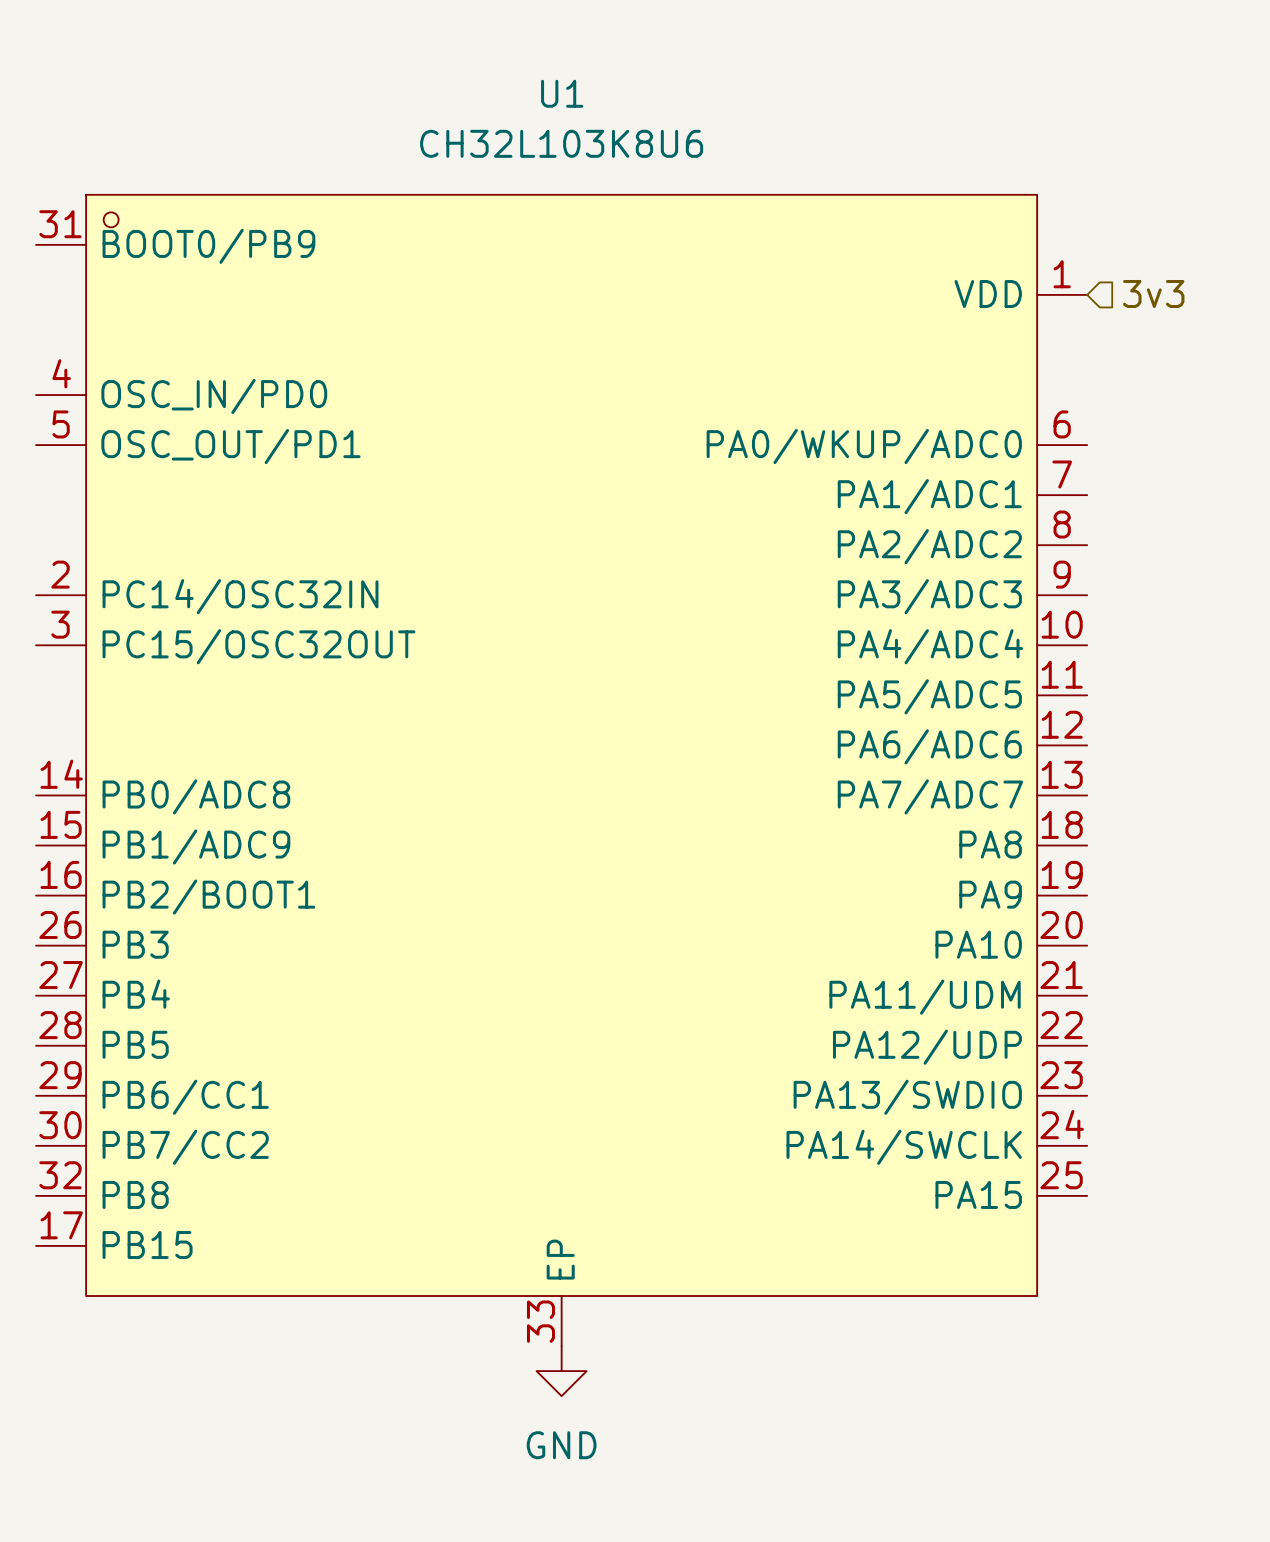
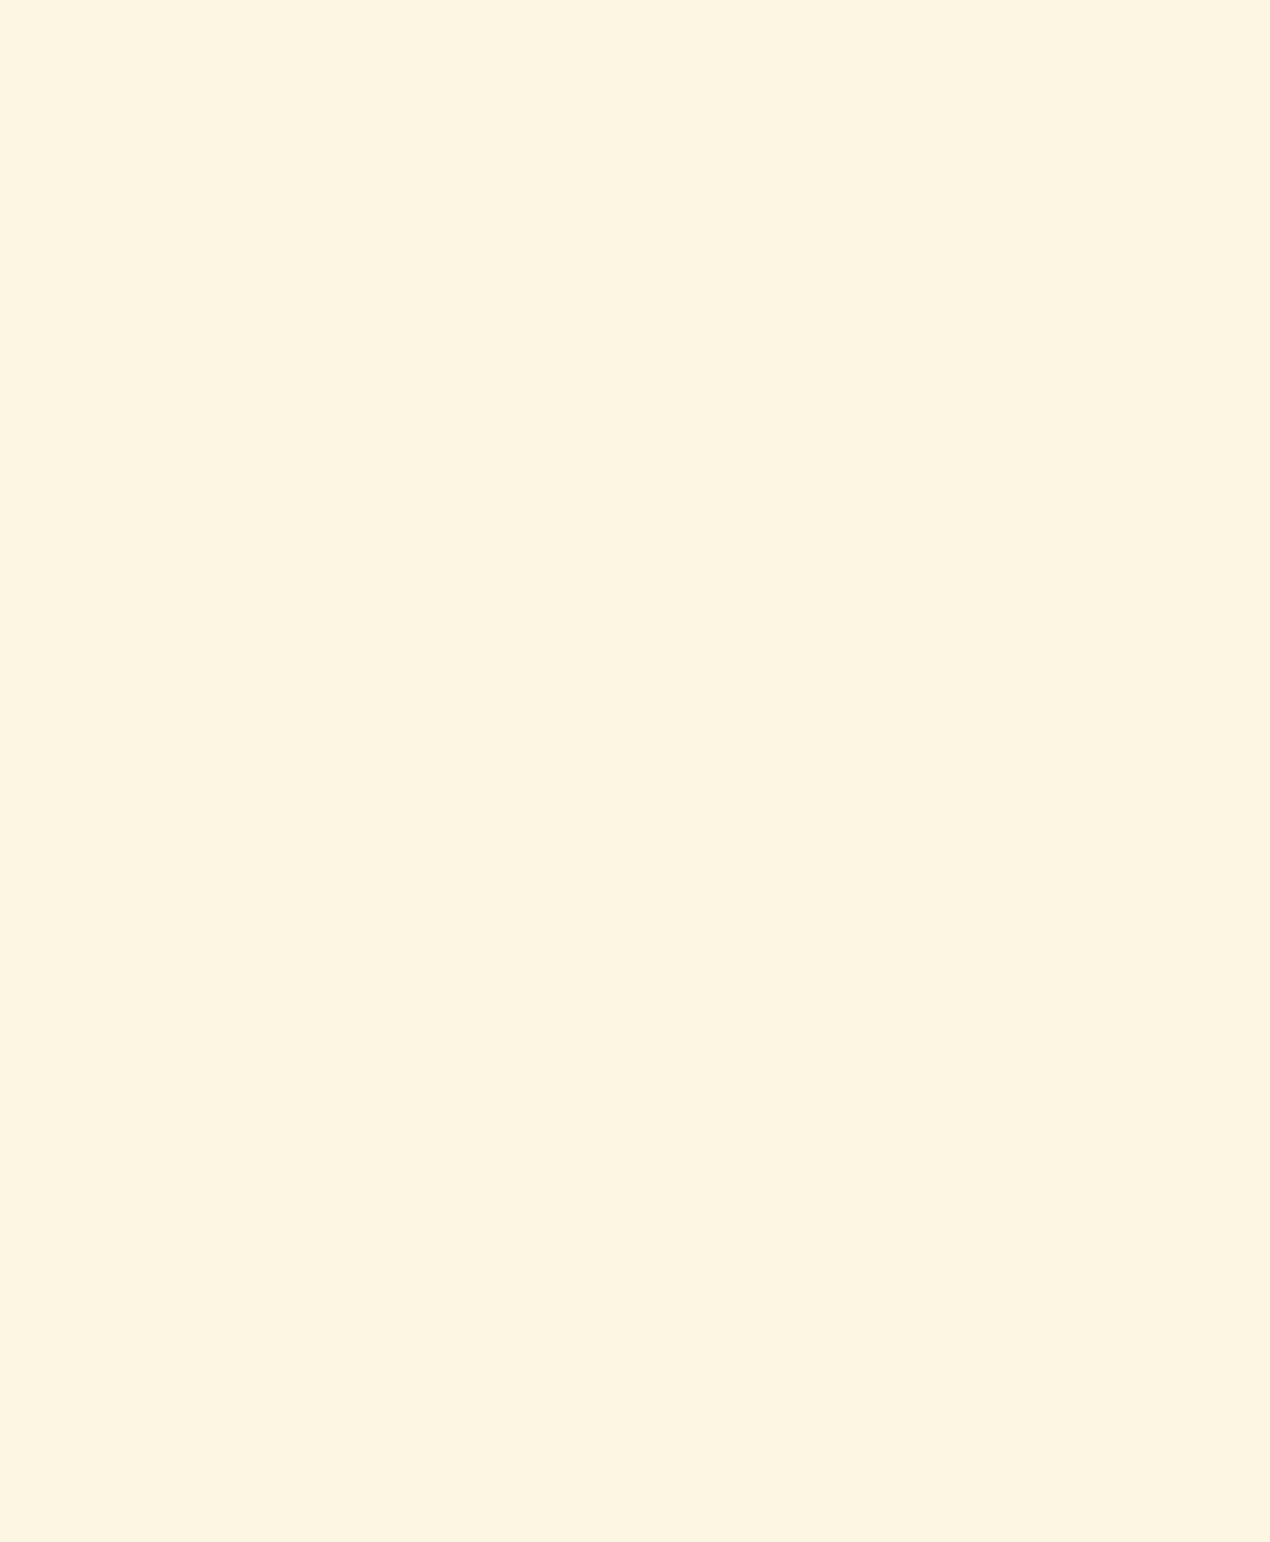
hierarchical label: 3v3 (1153, 293) -> none
U1: CH32L103K8U6 (561, 770) -> none
power symbol: GND (561, 1371) -> none

